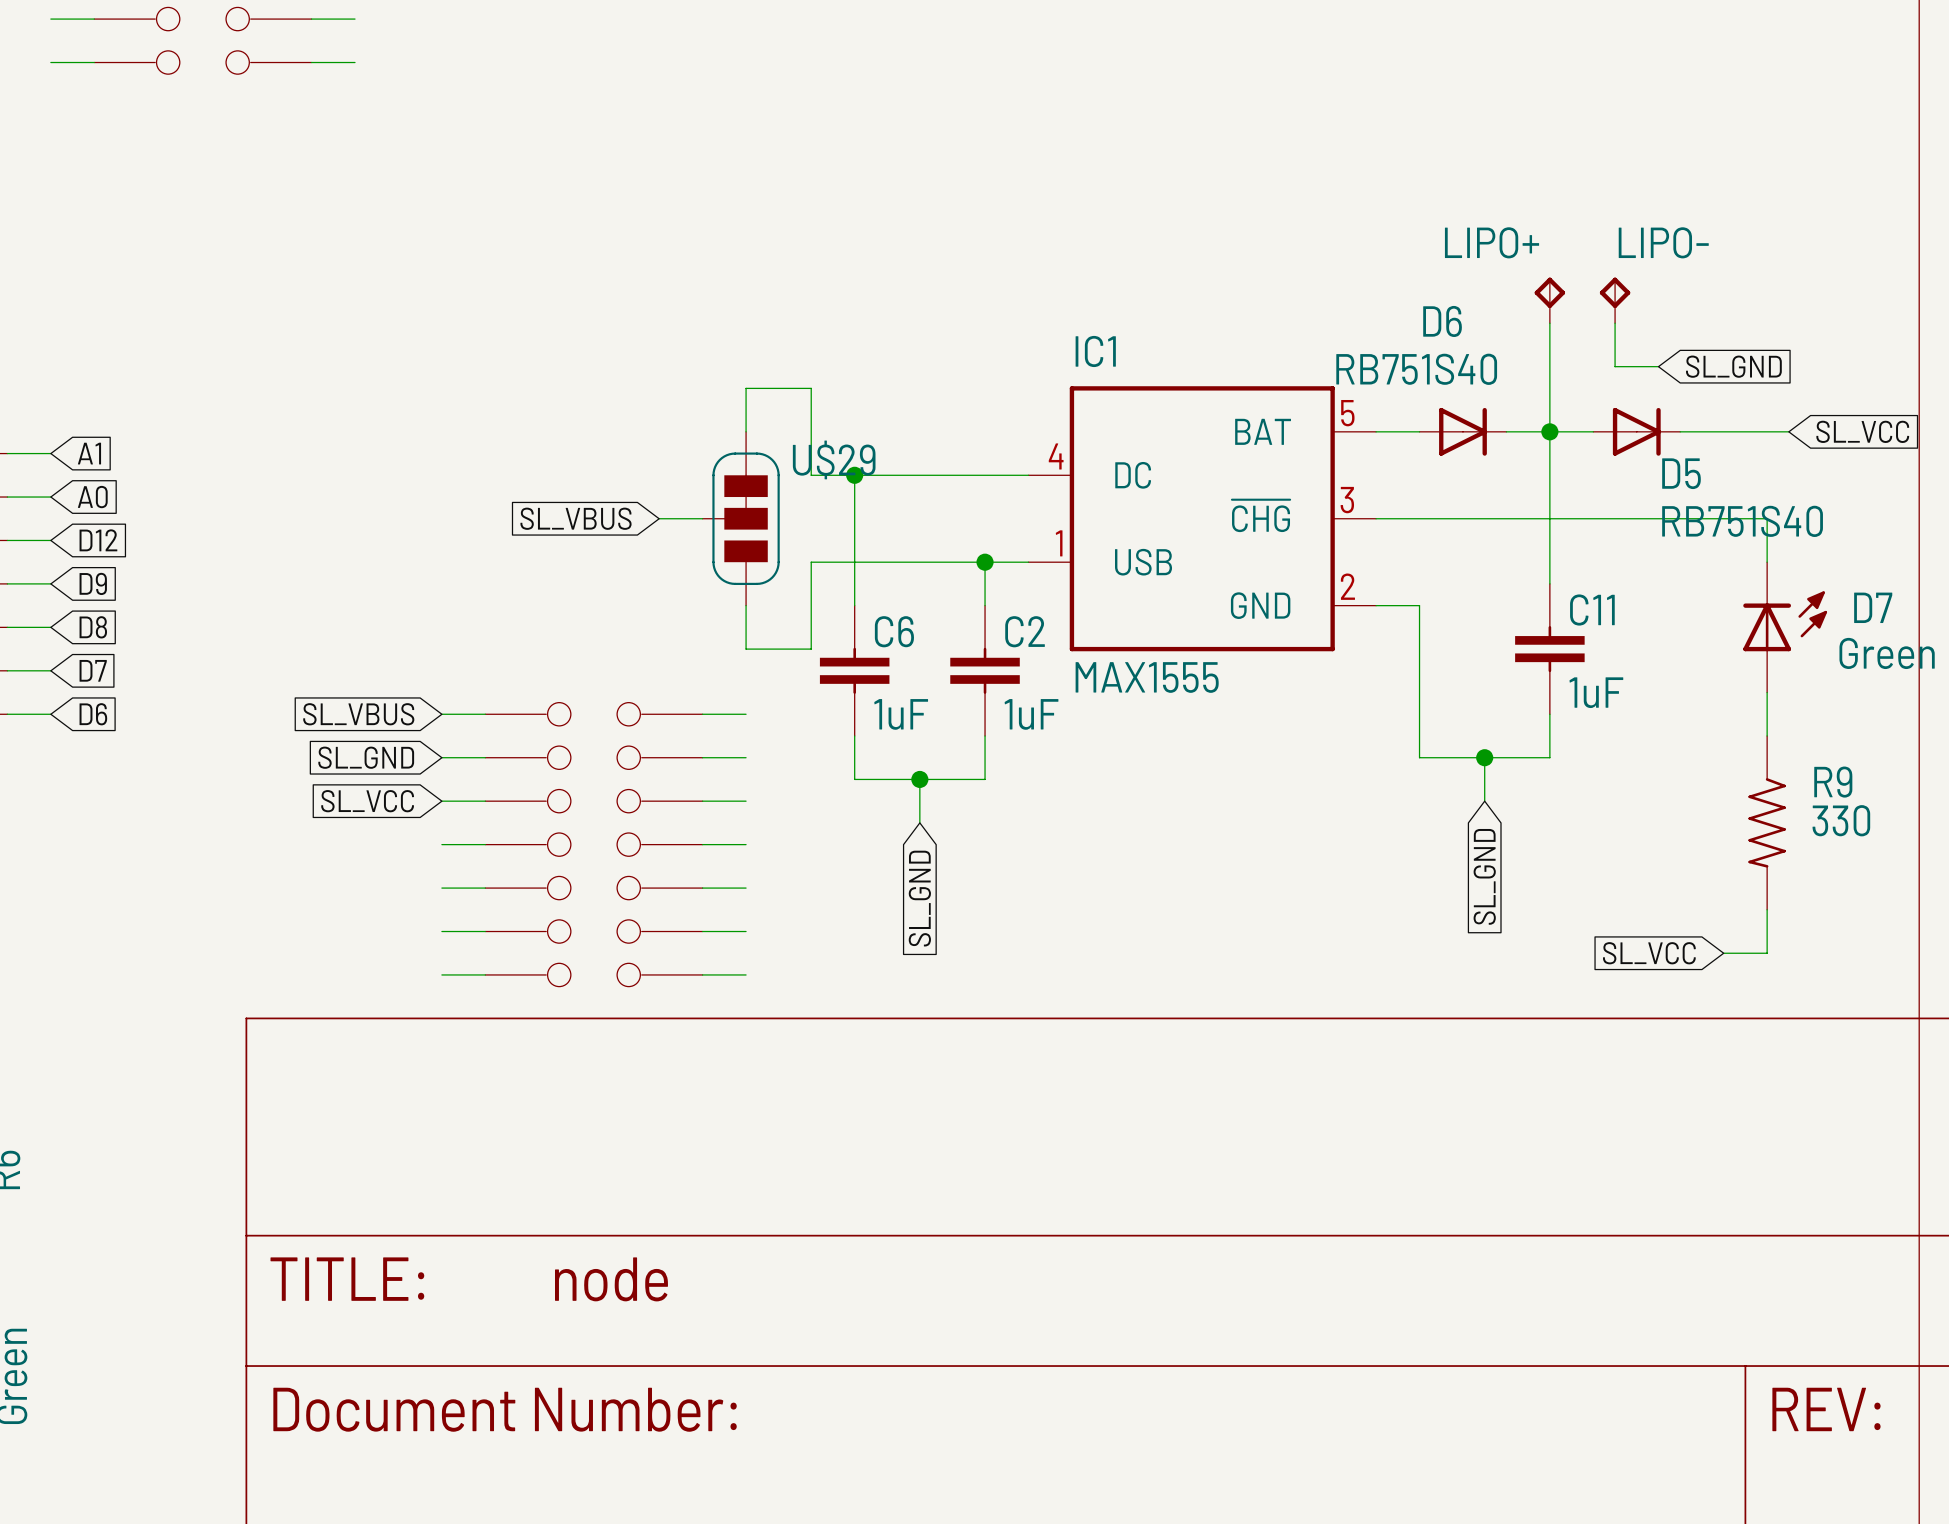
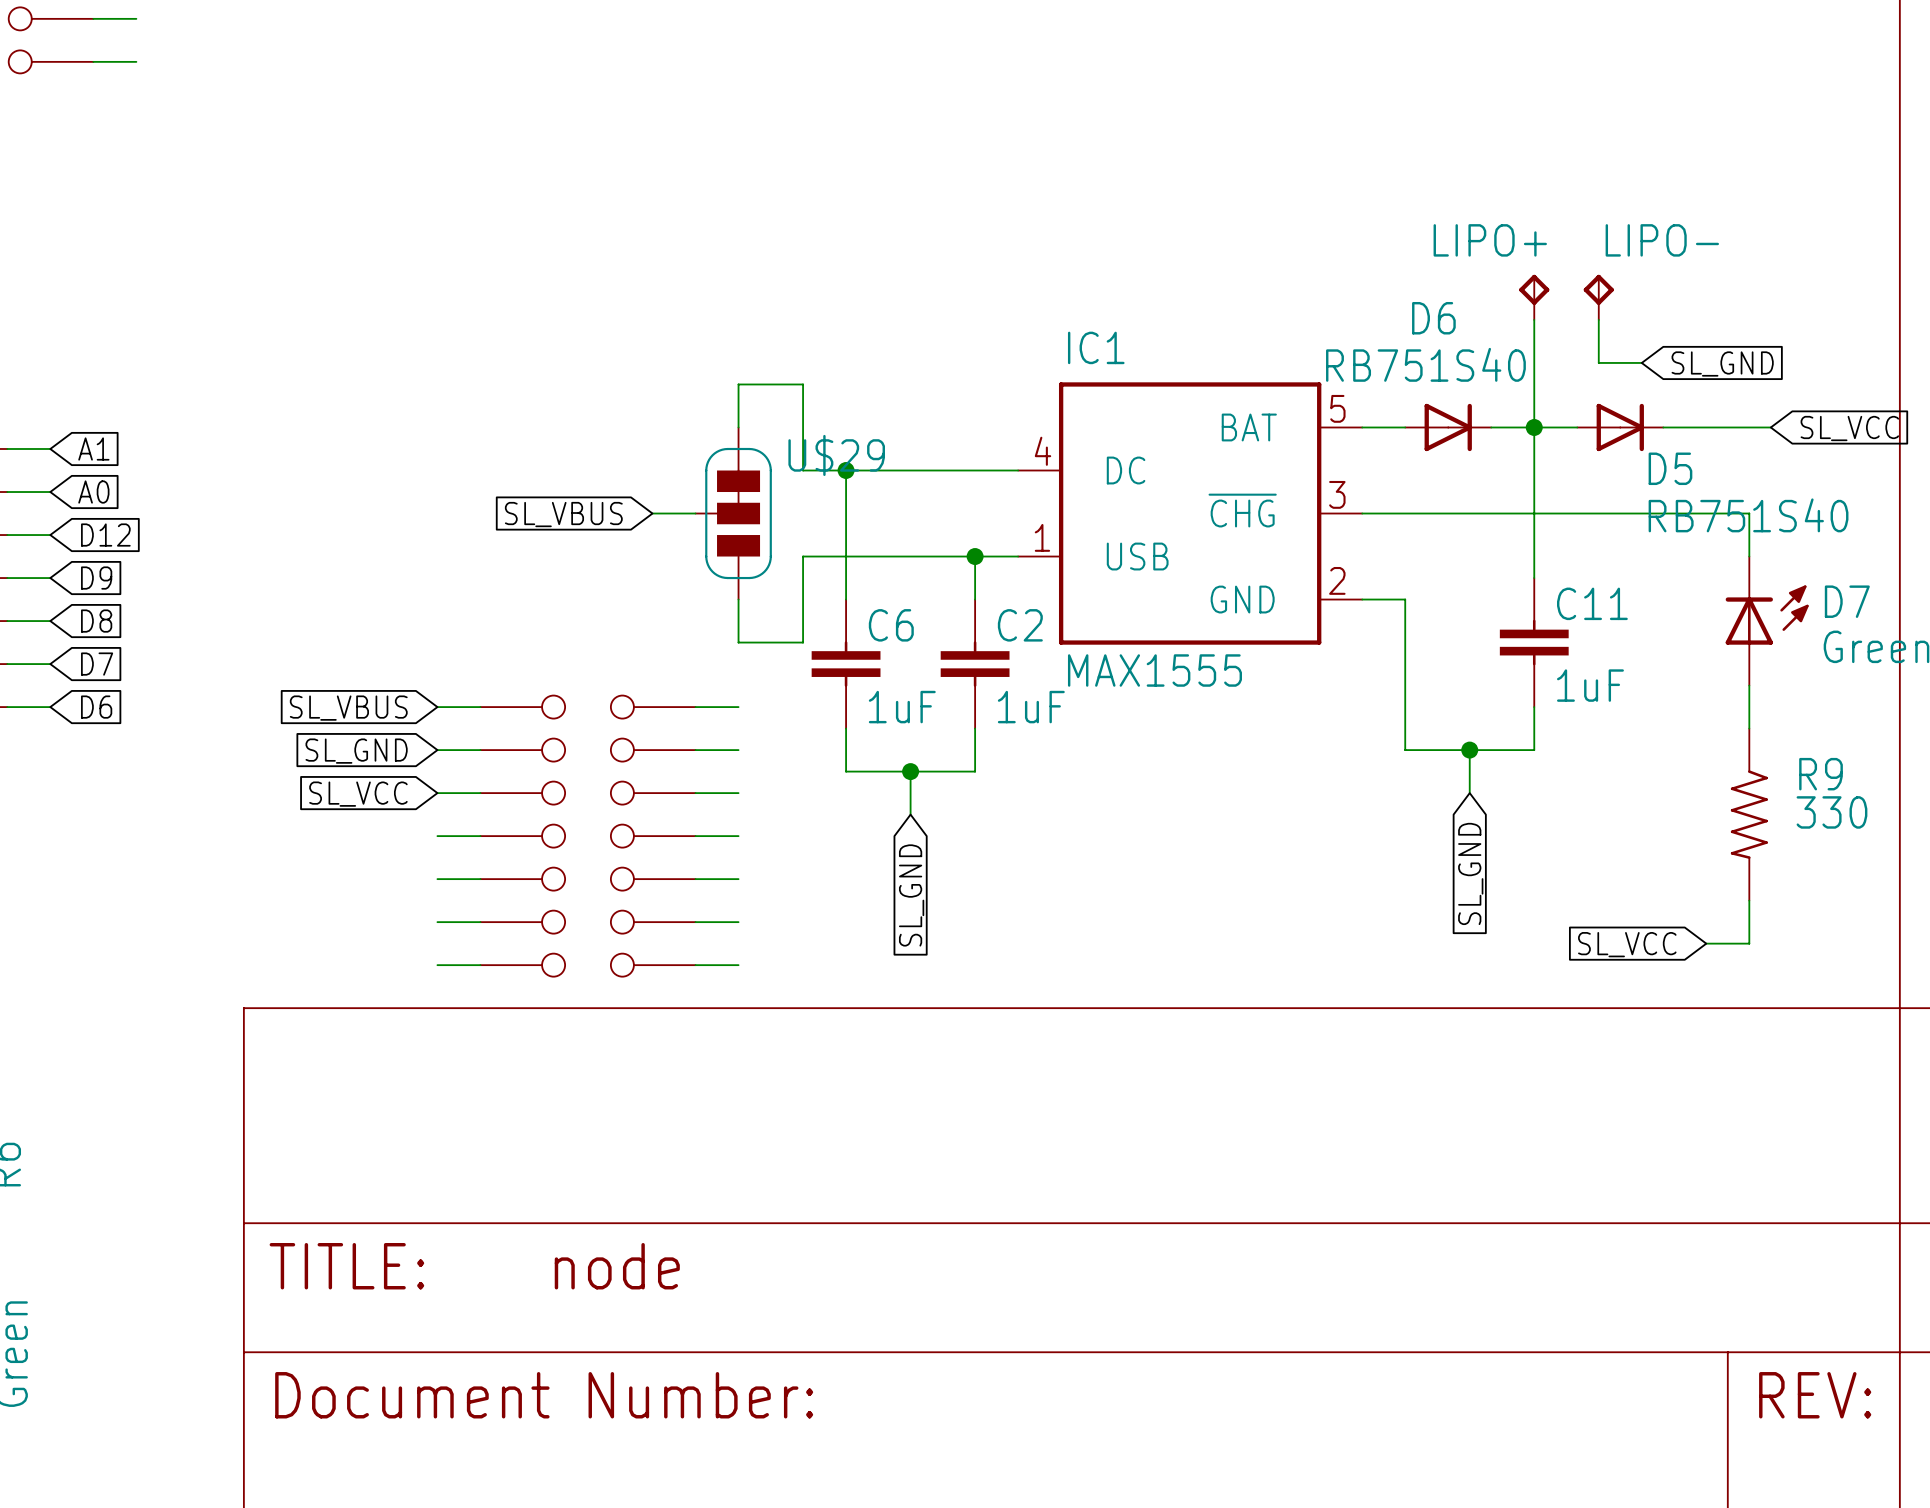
part: none -> (51, 18)
part: (137, 19) -> none
part: (268, 19) -> none
wire: (311, 19) (355, 19) -> none
part: none -> (51, 61)
part: (137, 62) -> none
part: (268, 62) -> none
wire: (311, 62) (355, 62) -> none

